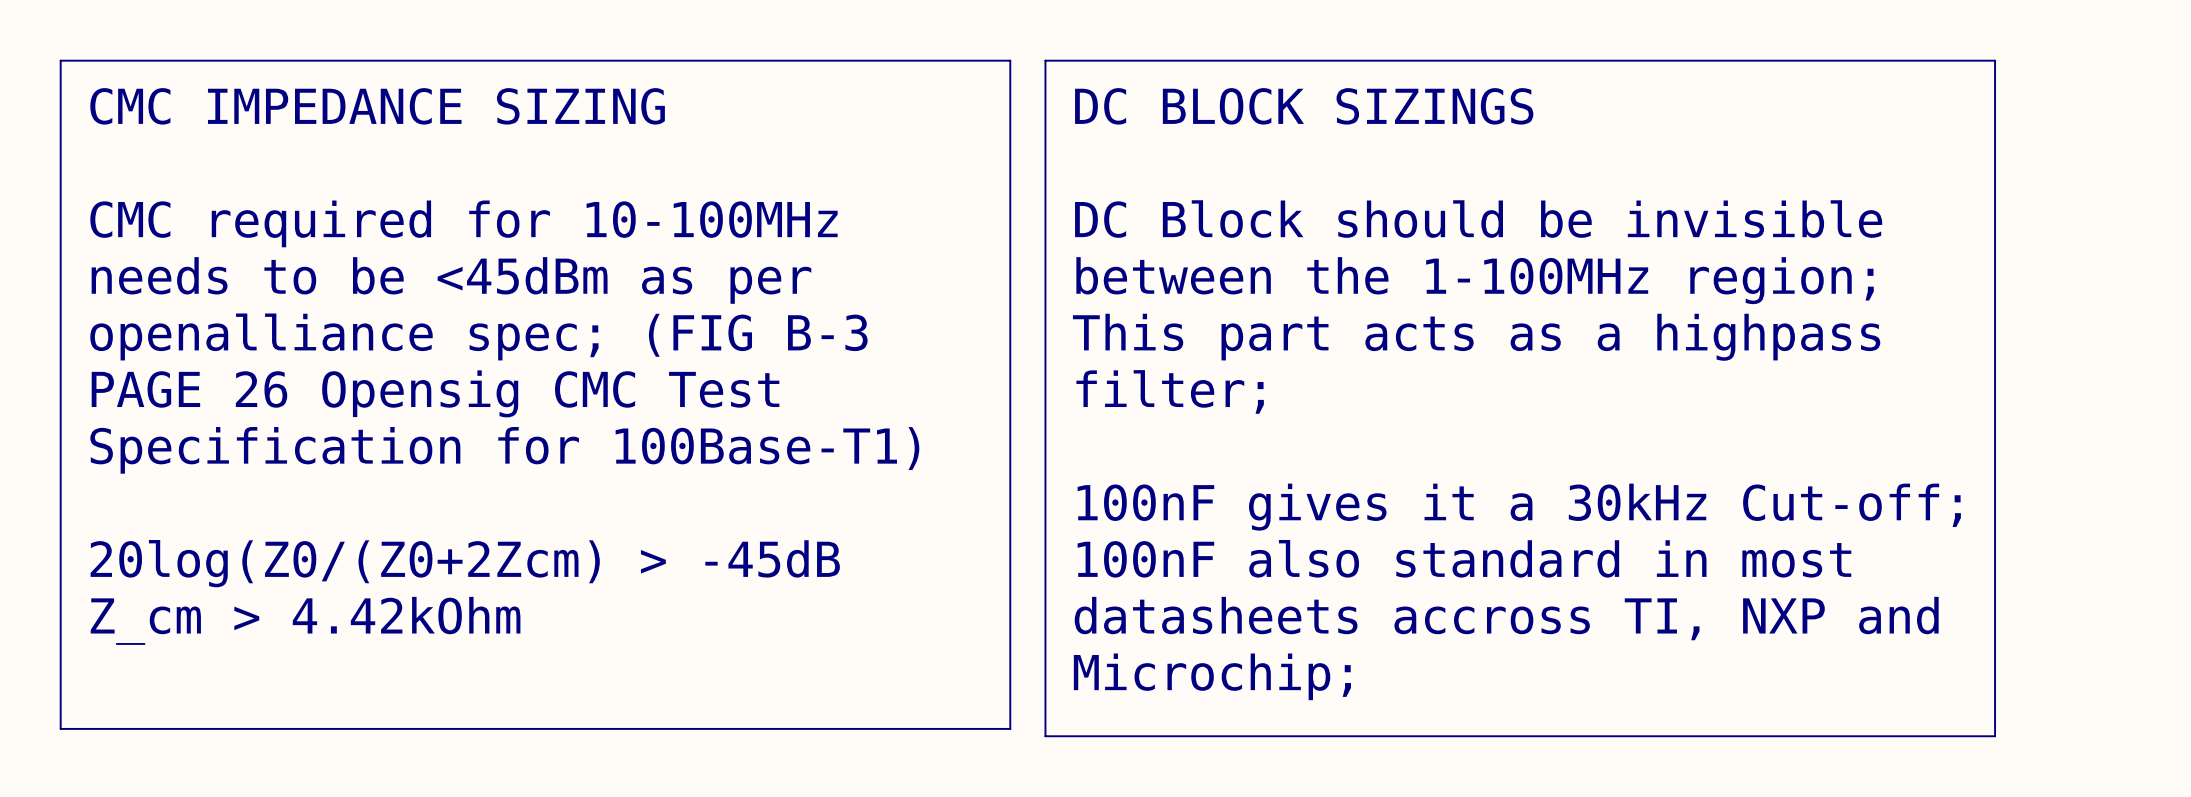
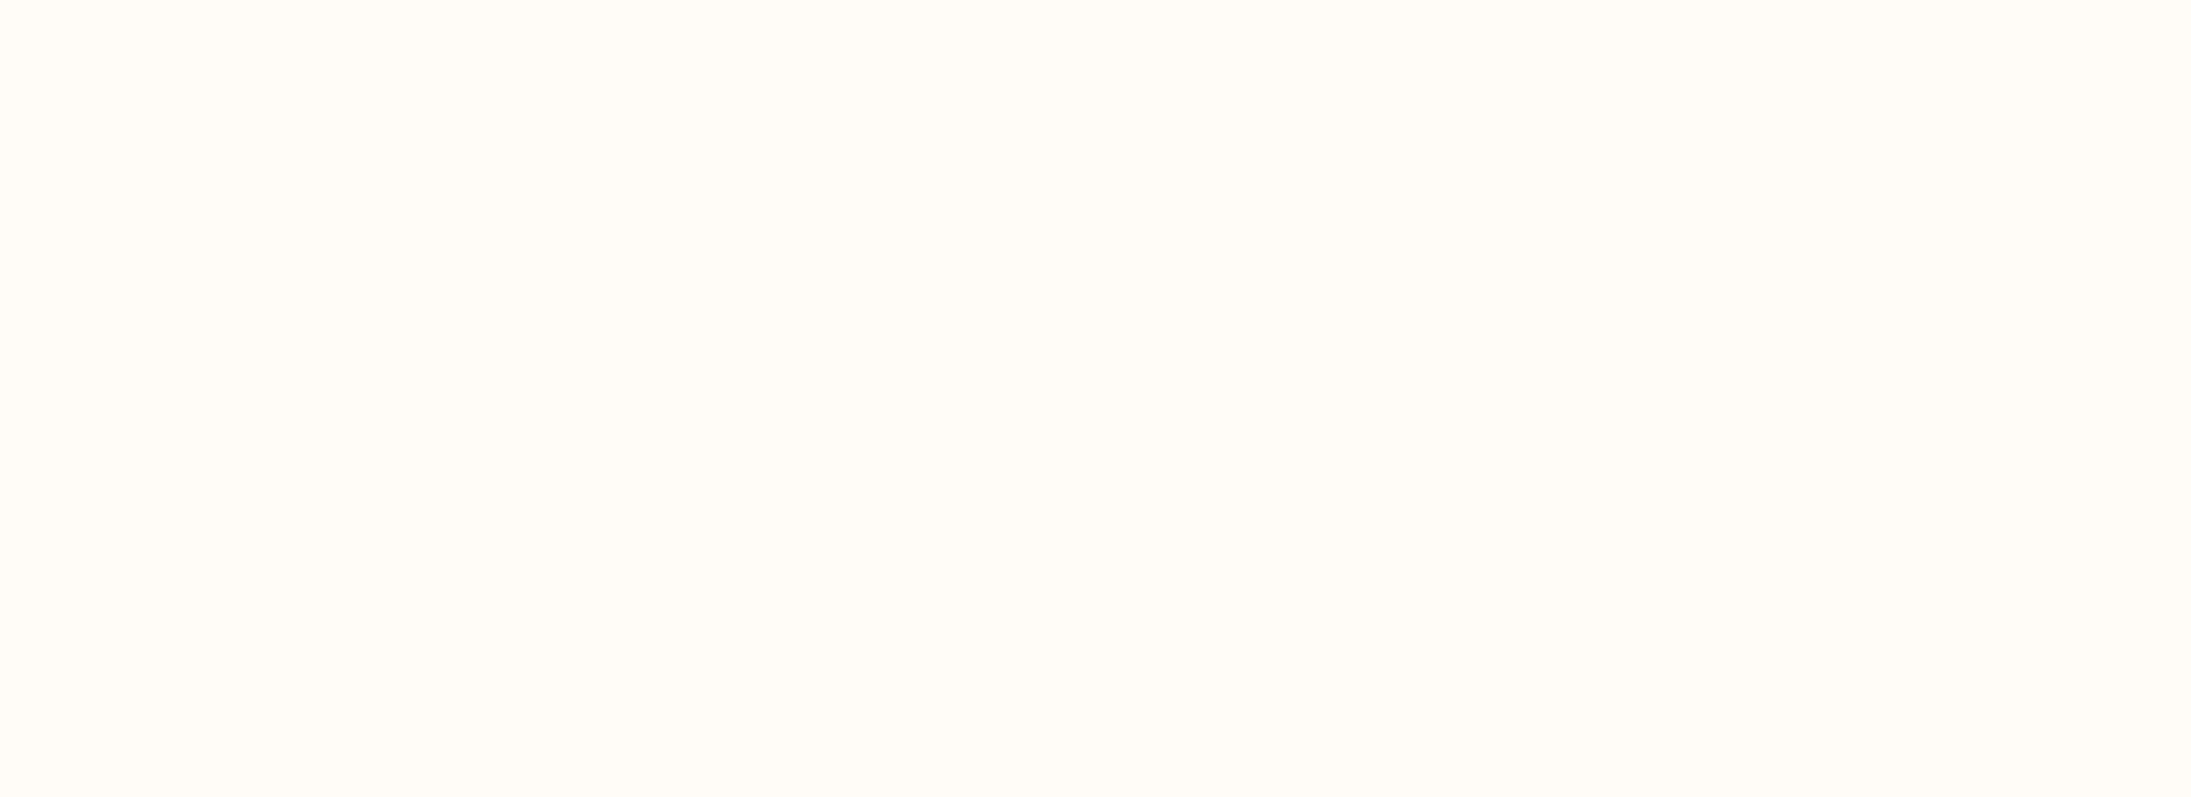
line: (60, 60) (1010, 60) (1010, 728) (60, 728) (60, 60) -> none
line: (1045, 60) (1995, 60) (1995, 736) (1045, 736) (1045, 60) -> none
text: CMC IMPEDANCE SIZING (377, 106) -> none
text: DC BLOCK SIZINGS (1304, 106) -> none
text: DC Block should be invisible (1478, 219) -> none
text: CMC required for 10-100MHz (463, 223) -> none
text: needs to be <45dBm as per (451, 280) -> none
text: between the 1-100MHz region; (1475, 280) -> none
text: openalliance spec; (FIG B-3 (478, 336) -> none
text: This part acts as a highpass (1476, 337) -> none
text: filter; (1170, 391) -> none
text: PAGE 26 Opensig CMC Test (435, 393) -> none
text: Specification for 100Base-T1) (504, 450) -> none
text: 100nF gives it a 30kHz Cut-off; (1519, 507) -> none
text: 100nF also standard in most (1464, 558) -> none
text: 20log(Z0/(Z0+2Zcm) > -45dB (465, 563) -> none
text: datasheets accross TI, NXP and (1506, 618) -> none
text: Z_cm > 4.42kOhm (305, 620) -> none
text: Microchip; (1212, 676) -> none

